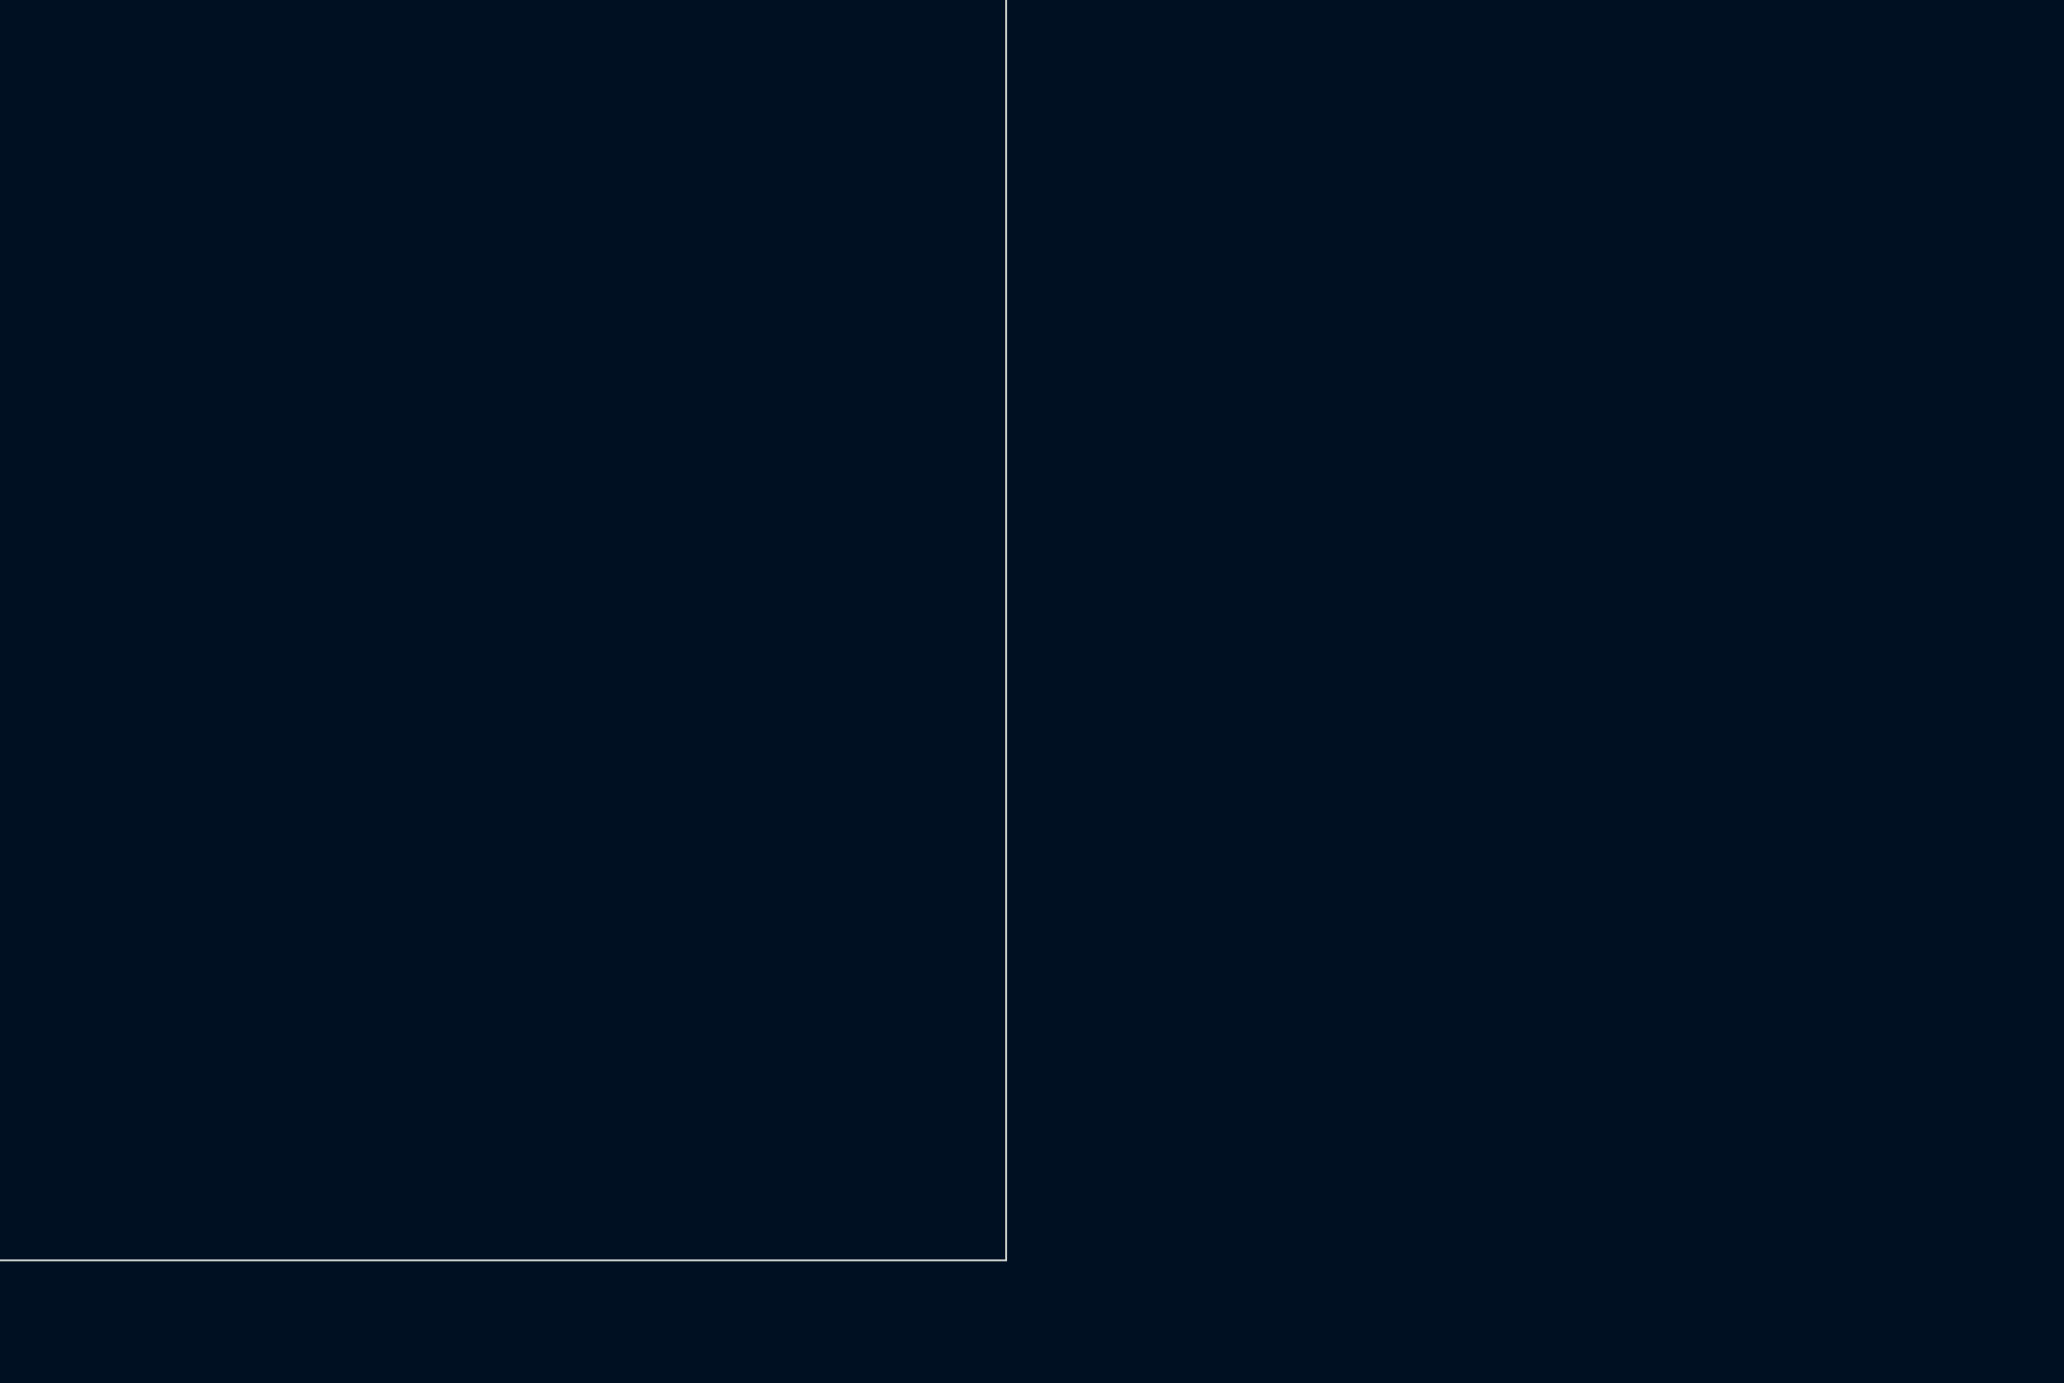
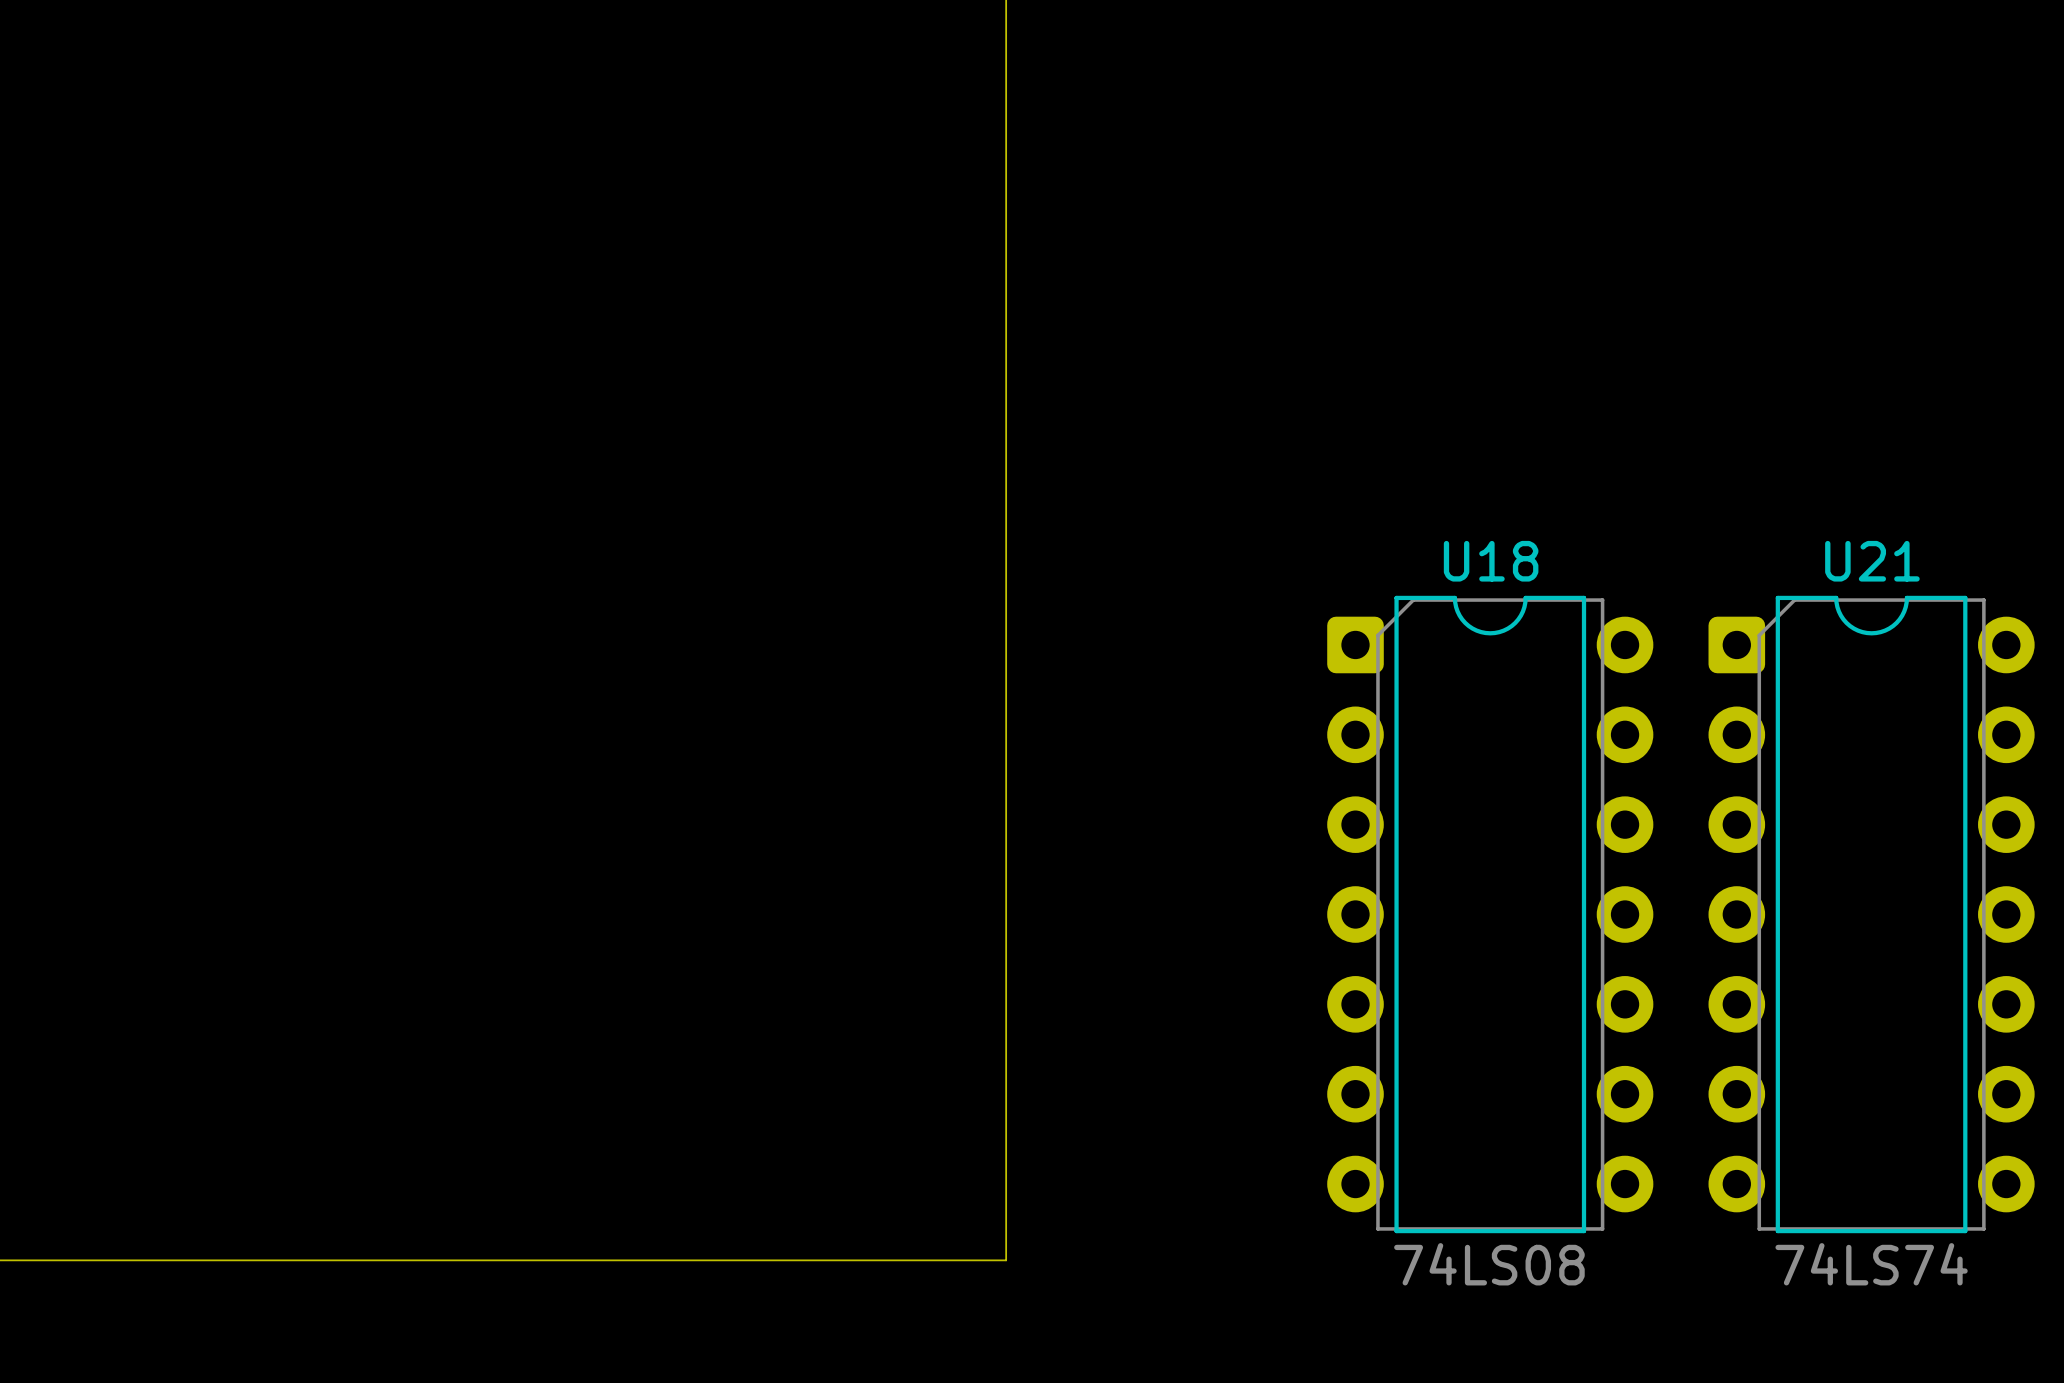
U18: none -> 74LS08 (1490, 914)
U21: none -> 74LS74 (1871, 914)

